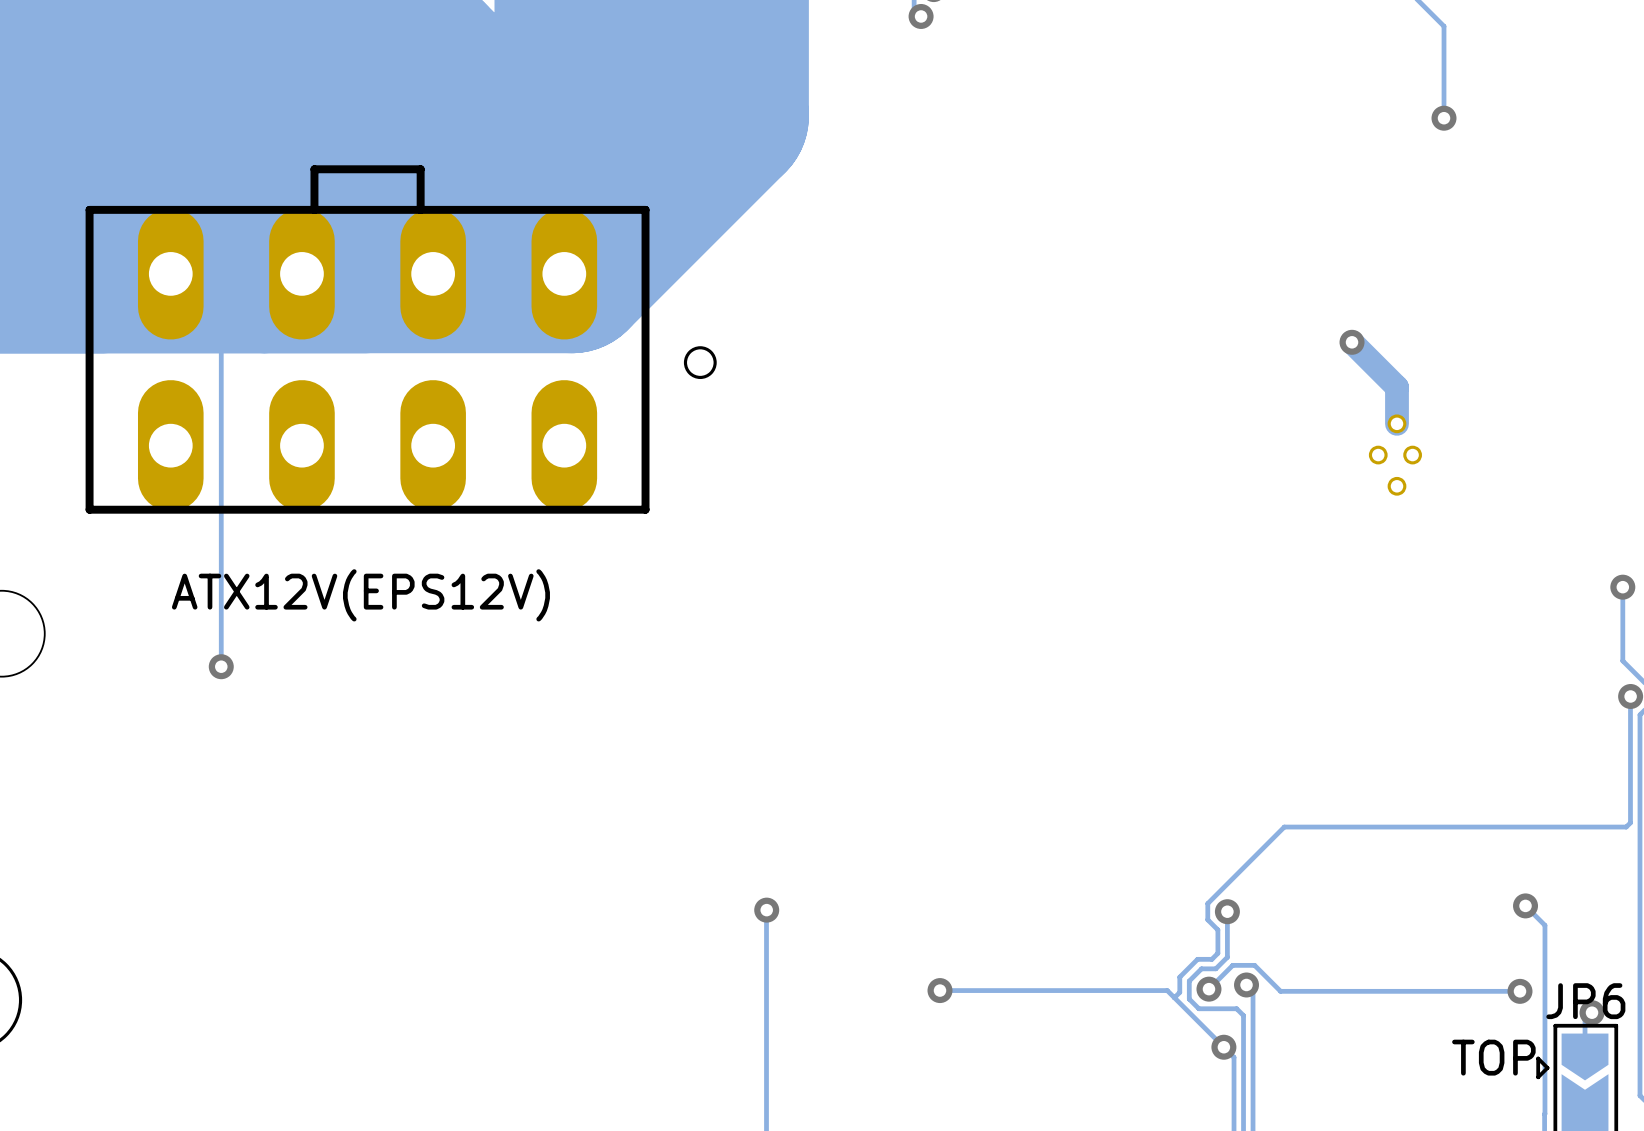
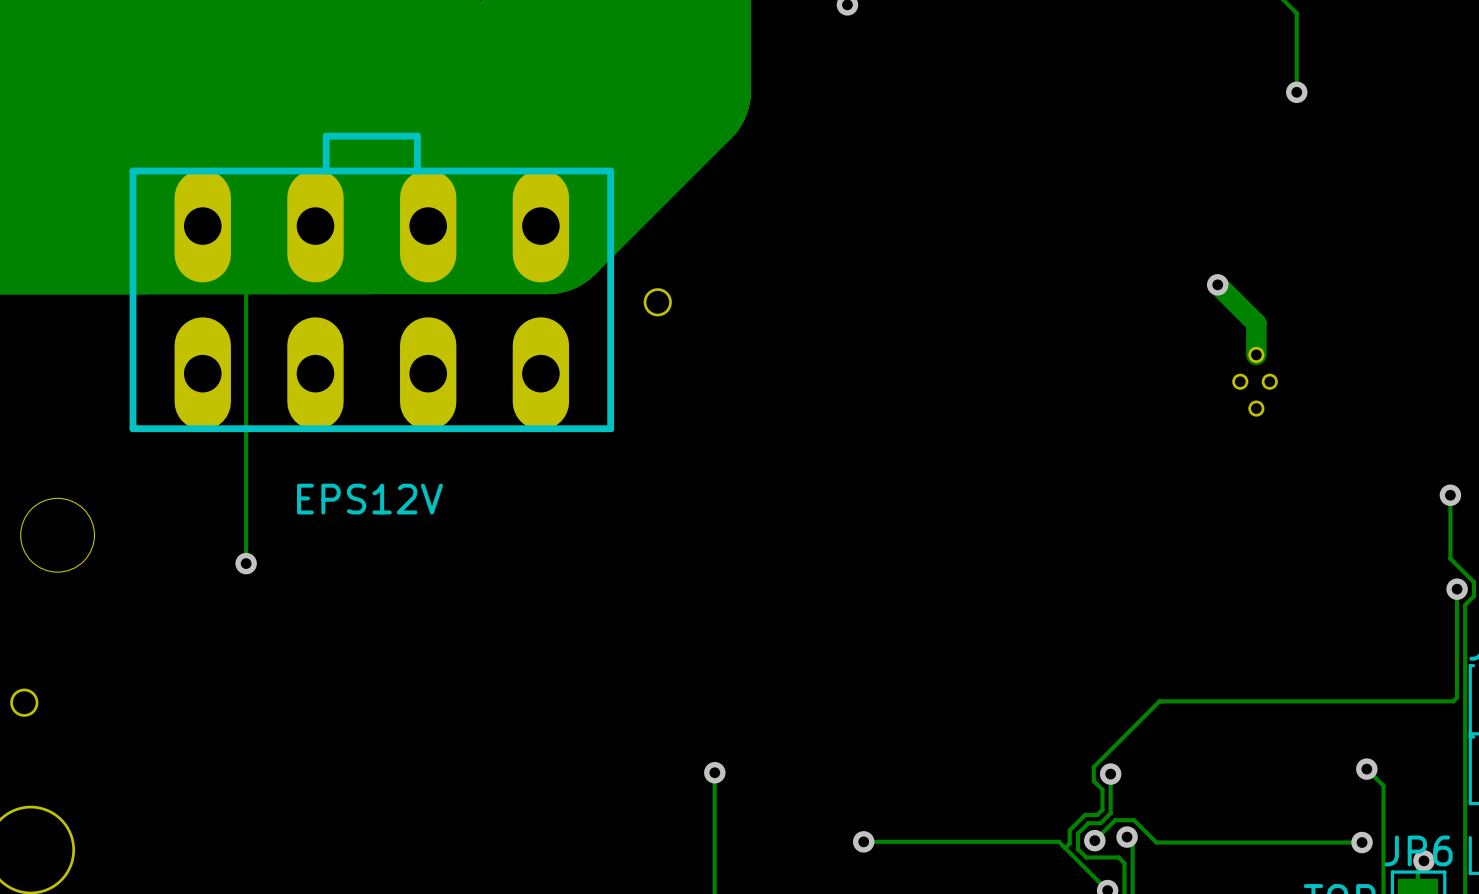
text: ATX12V(EPS12V) (360, 595) -> EPS12V (369, 499)

